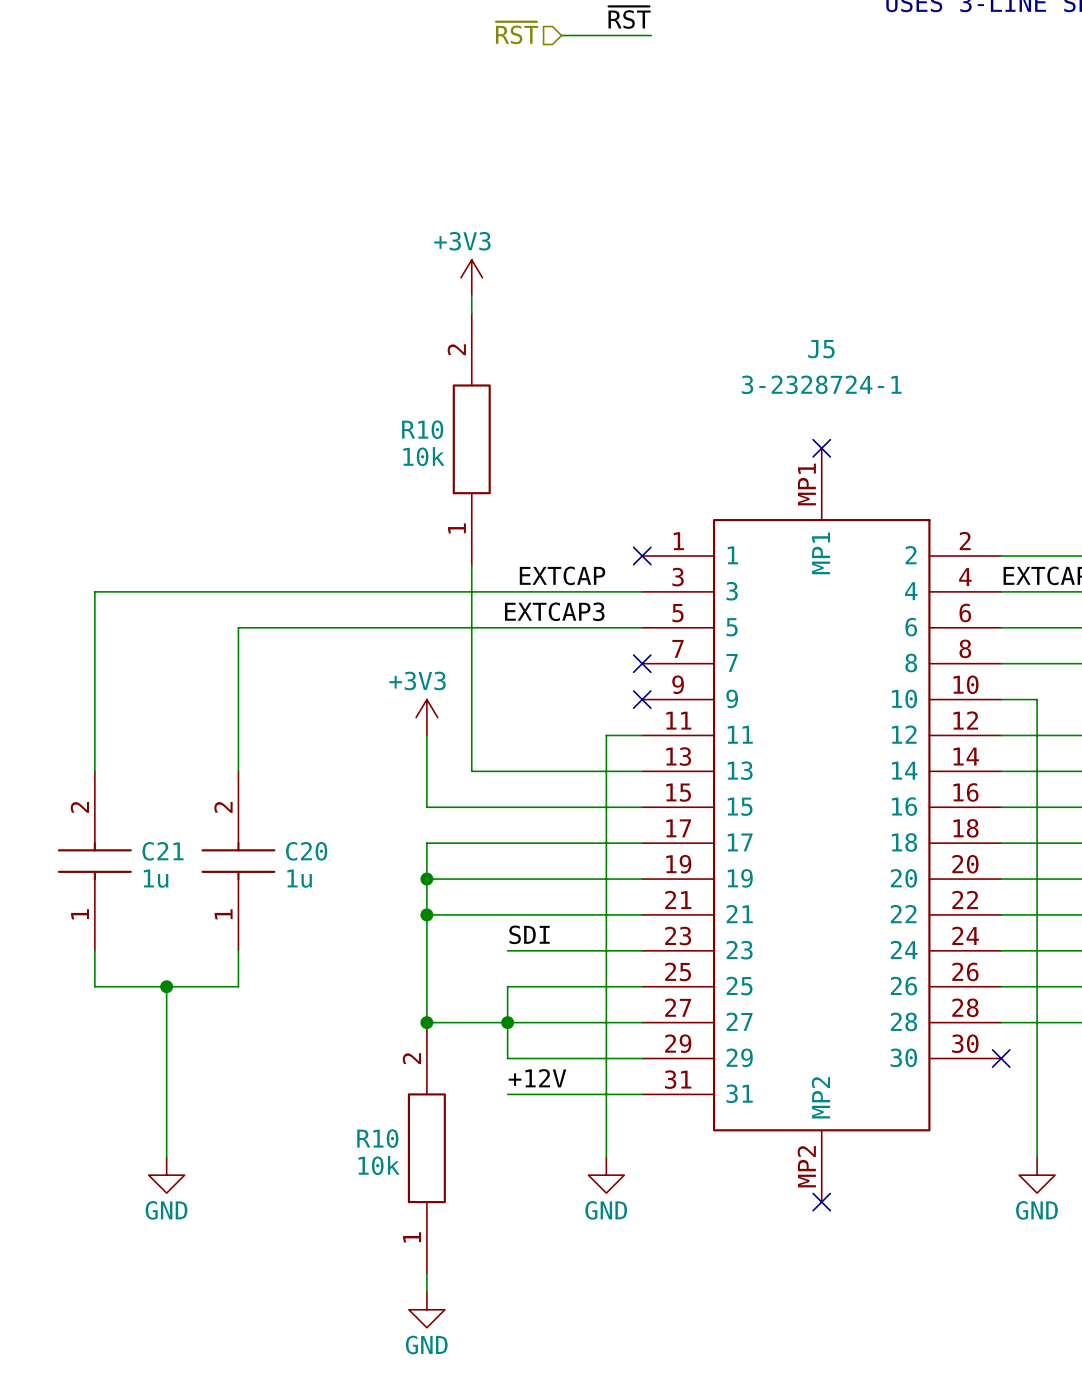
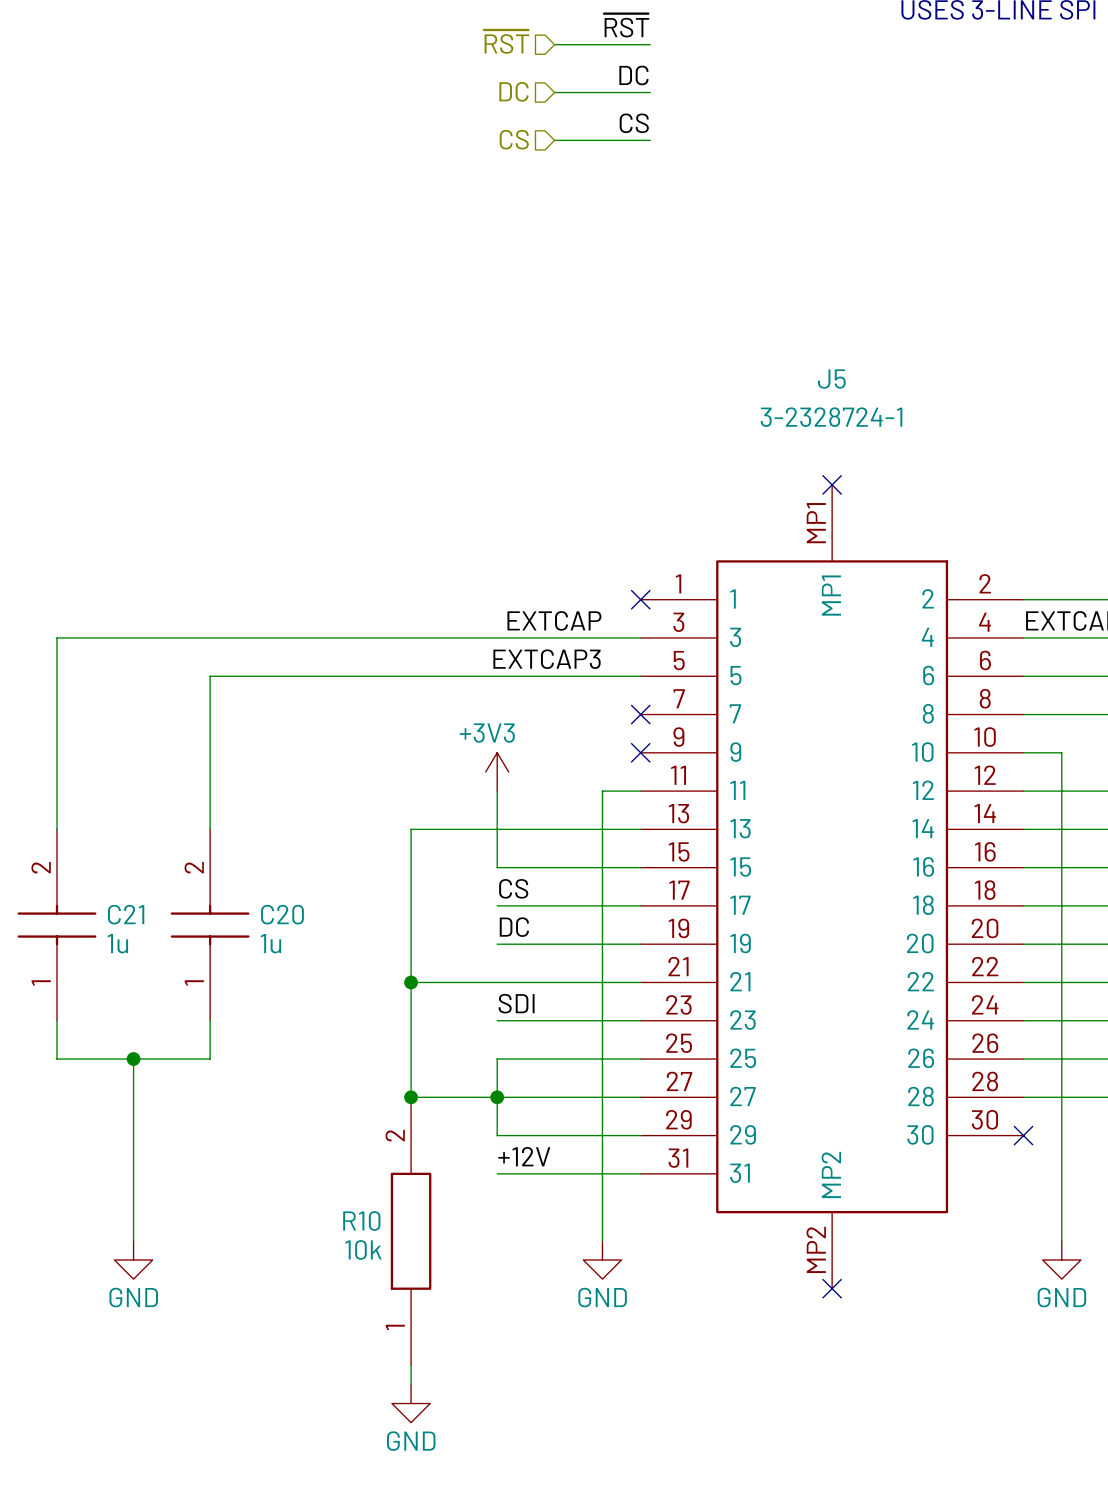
label: none -> DC (633, 75)
hierarchical label: none -> DC (513, 91)
wire: none -> (554, 92) (650, 92)
label: none -> CS (634, 123)
hierarchical label: none -> CS (514, 139)
wire: none -> (554, 140) (650, 140)
power symbol: +3V3 (471, 277) -> none
wire: (471, 295) (471, 313) -> none
R10: 10k (471, 439) -> none
wire: (471, 564) (471, 771) -> none
power symbol position: +3V3 (426, 717) -> +3V3 (497, 771)
wire: (426, 735) (426, 771) -> (458, 829) (411, 829)
wire: none -> (497, 791) (497, 867)
wire: (426, 807) (507, 807) -> (411, 867) (411, 905)
label: none -> CS (513, 888)
wire: (426, 843) (507, 843) -> none
label: none -> DC (514, 927)
wire: (426, 879) (507, 879) -> none
junction: (426, 879) -> none

